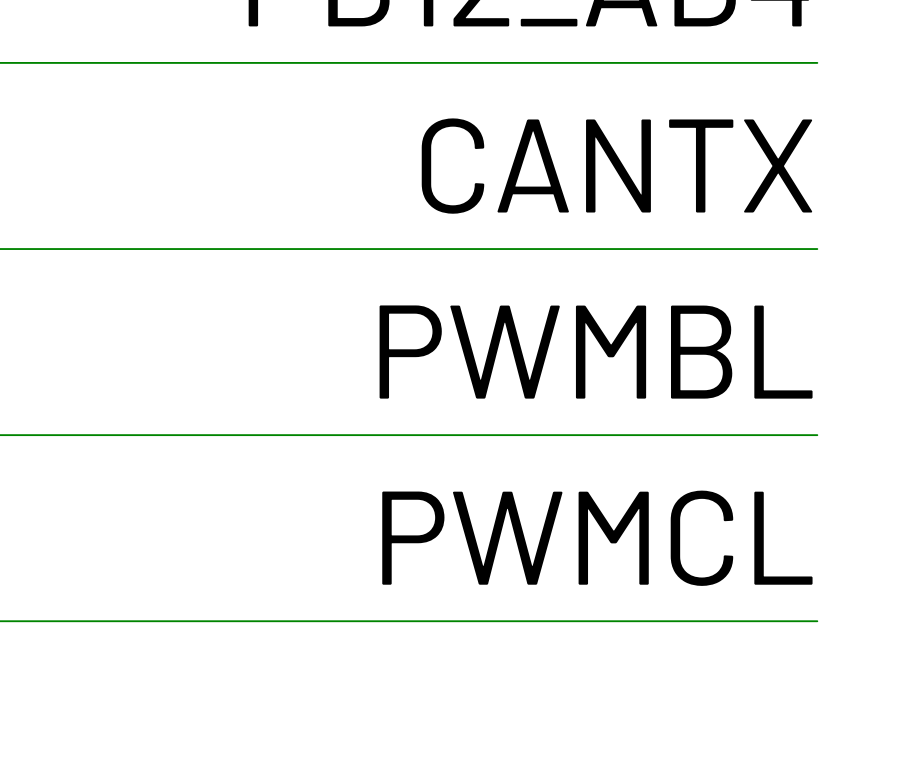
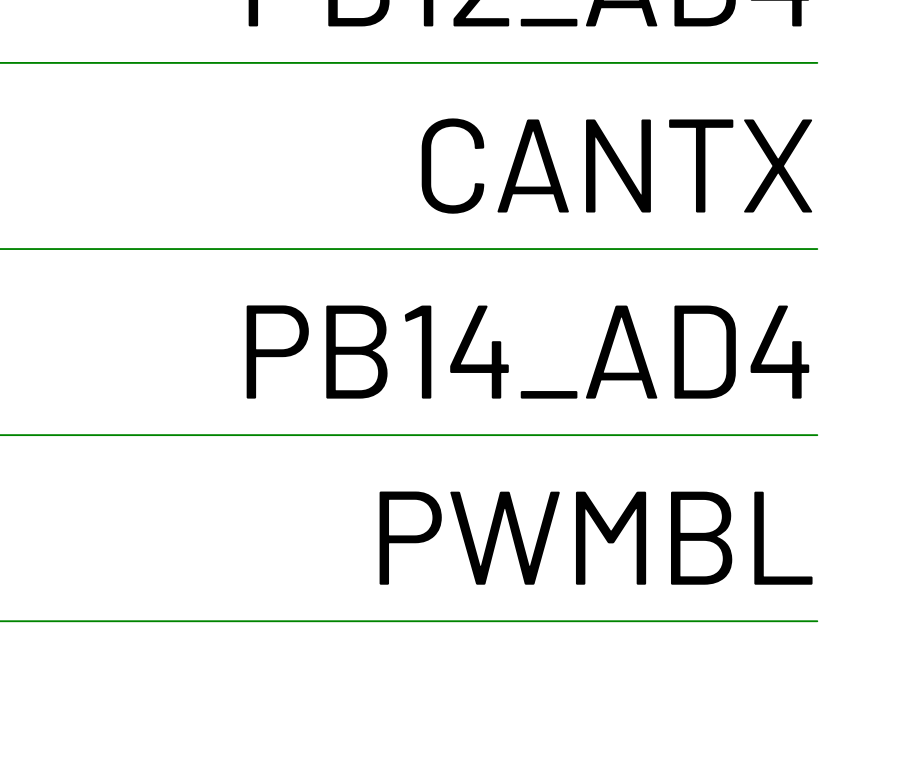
label: PWMBL (596, 352) -> PB14_AD4 (527, 352)
label: PWMCL (597, 538) -> PWMBL (596, 538)

